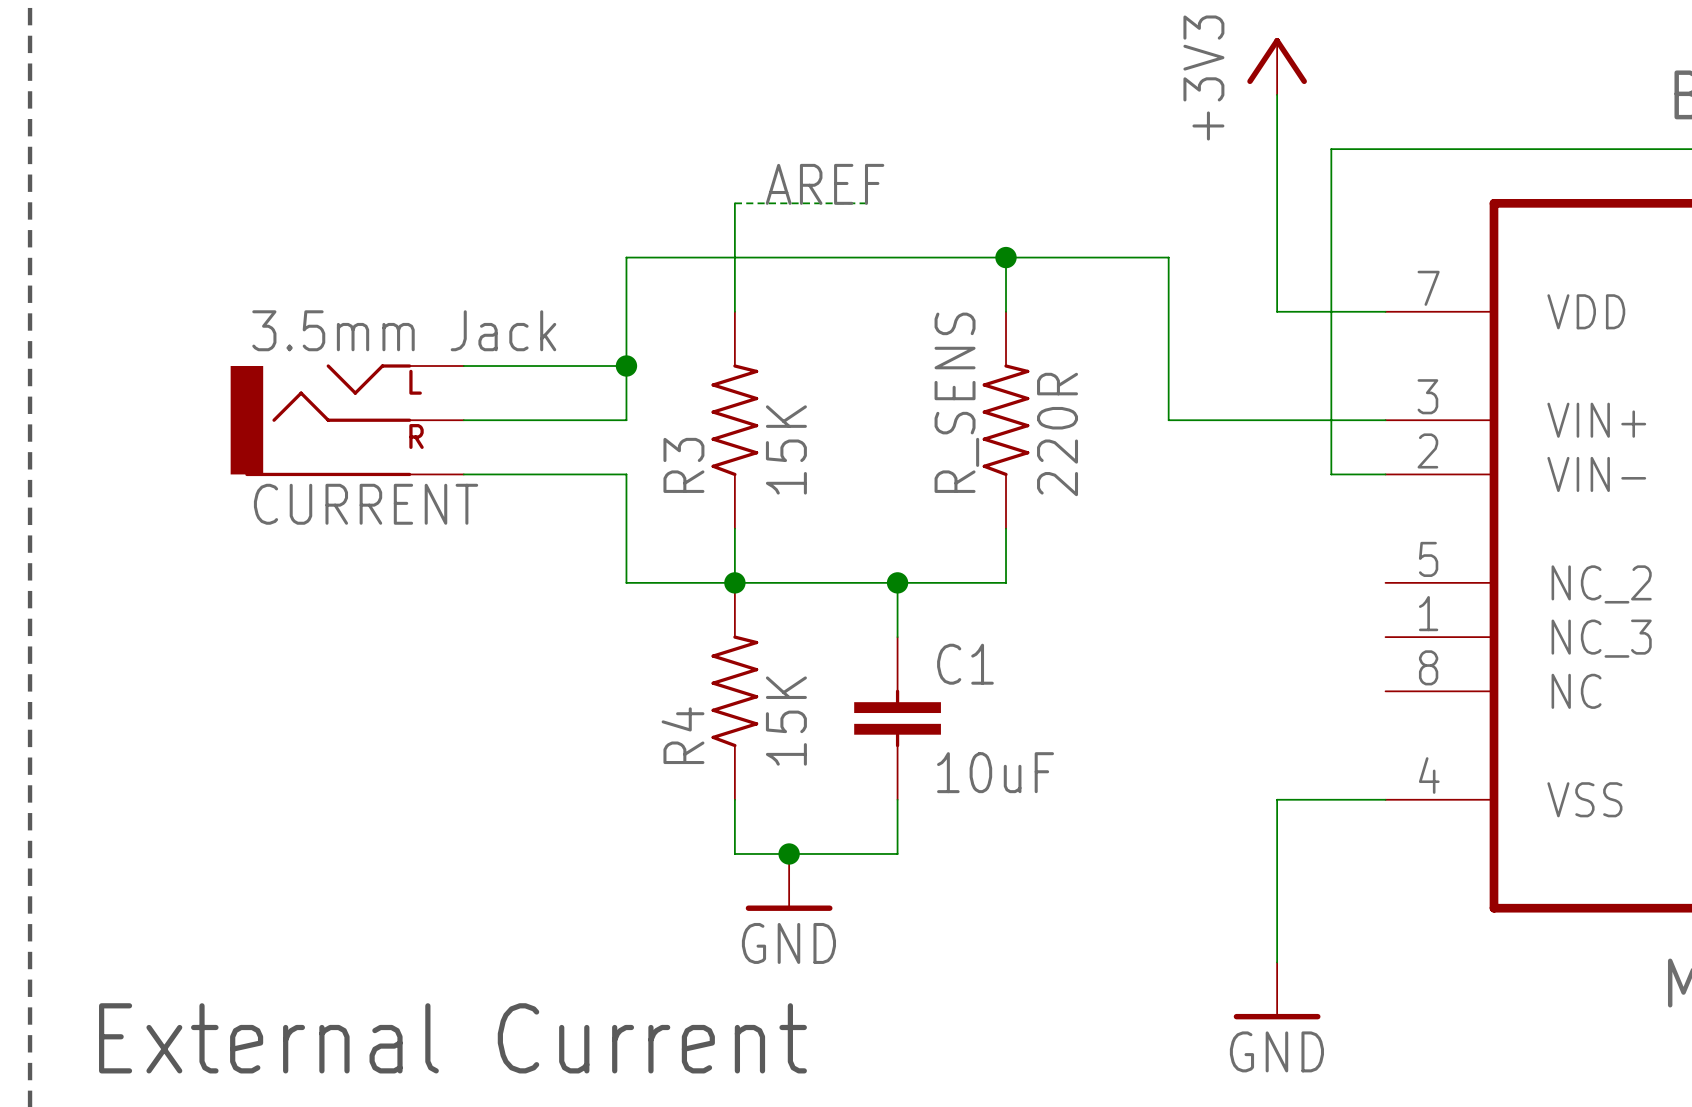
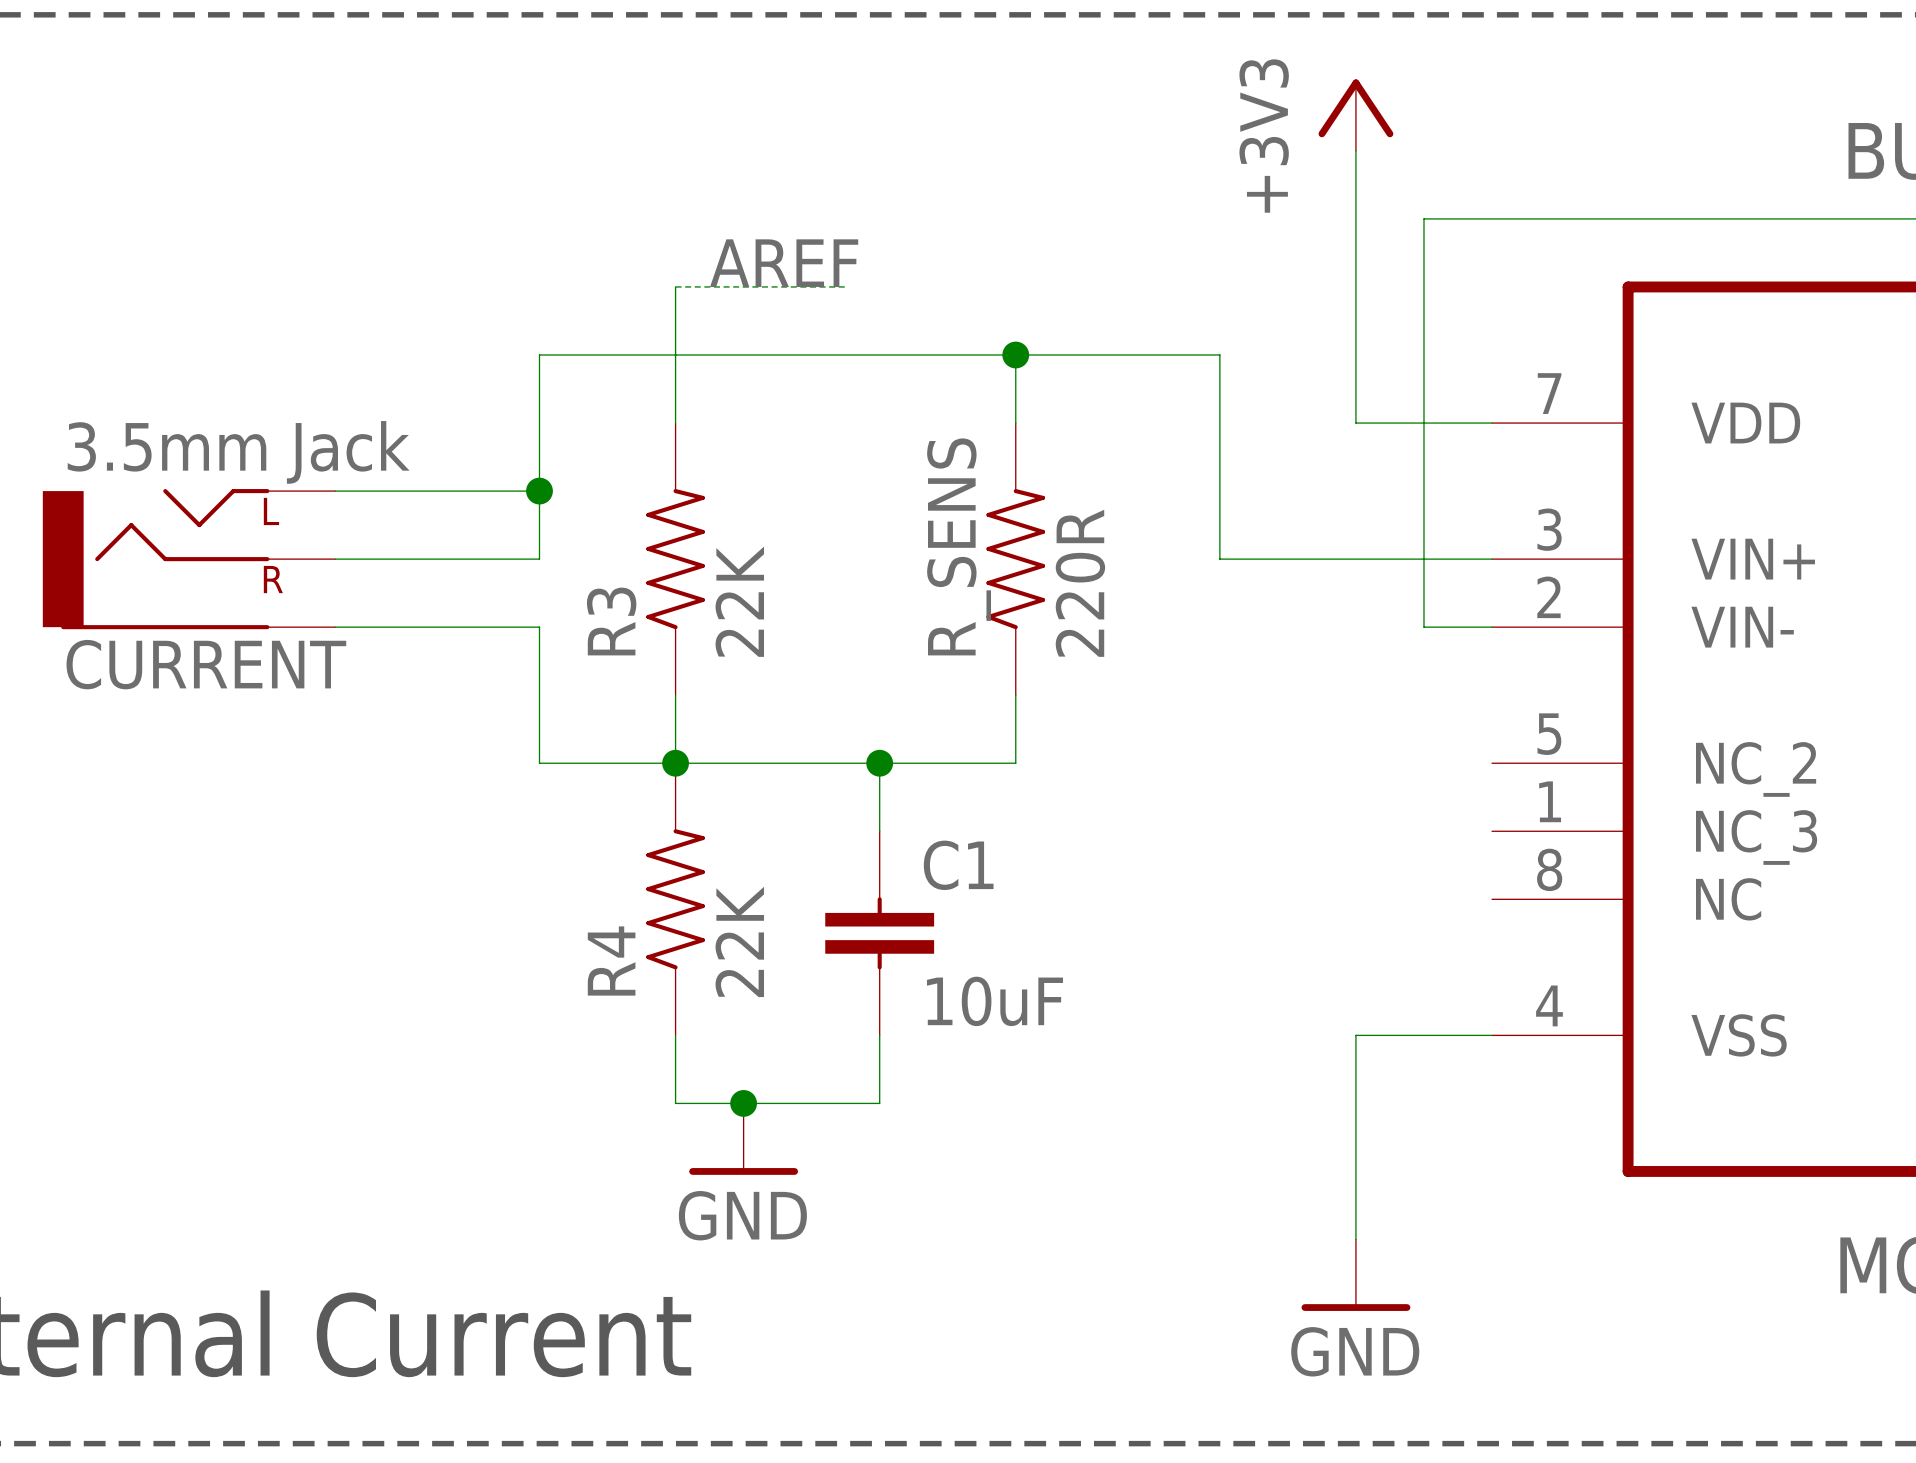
R3 value: 15K (786, 449) -> 22K (739, 601)
R4 value: 15K (786, 721) -> 22K (739, 941)

